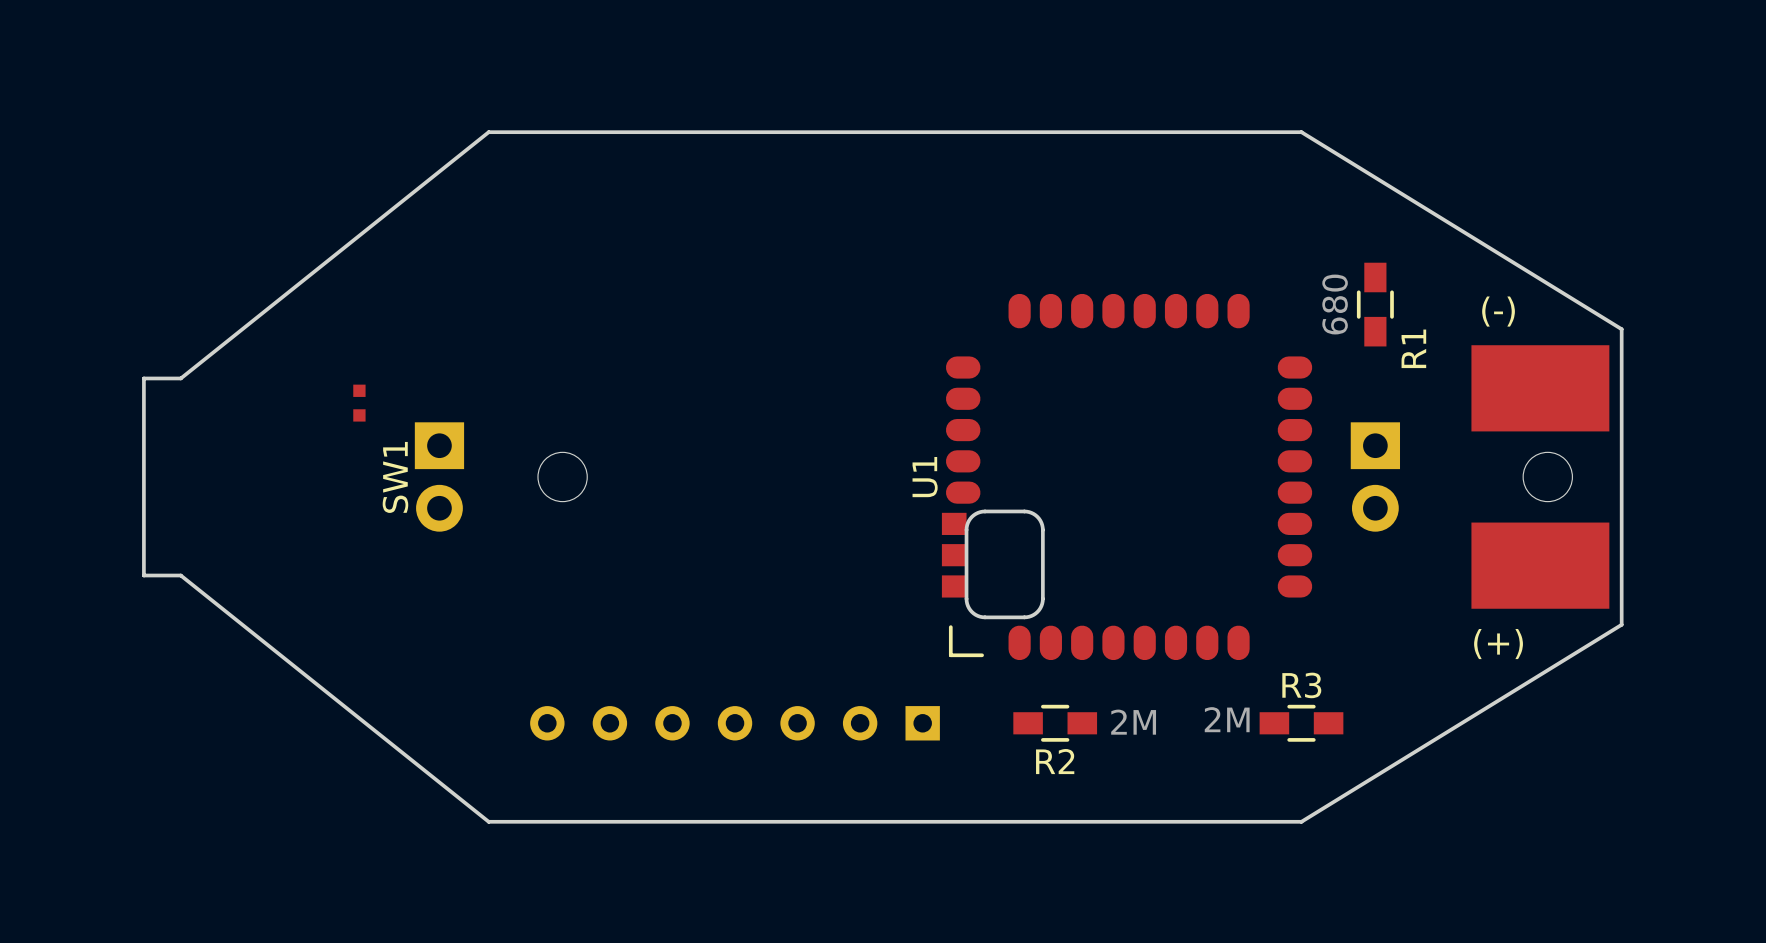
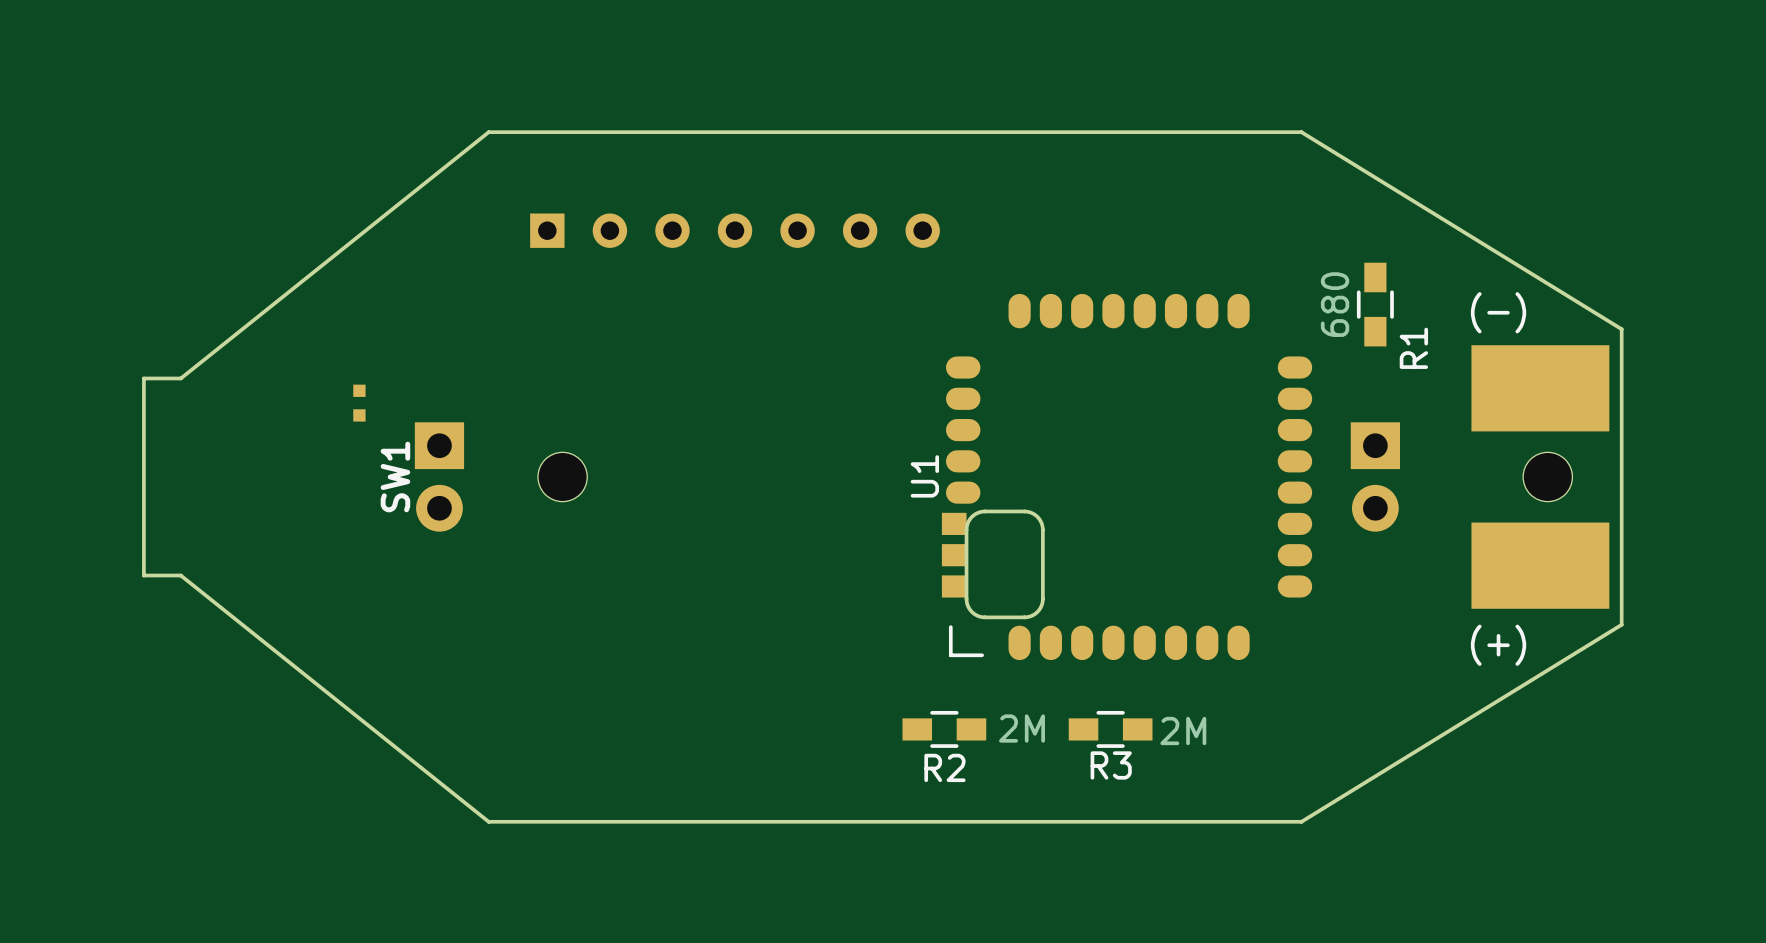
R3 name position: R3 (1301, 685) -> R3 (1111, 765)
R3 value position: 2M (1227, 719) -> 2M (1183, 730)
part rotation: 0° (735, 723) -> 180° (735, 230)
part position: (735, 723) -> (735, 230)
R2 position: (1055, 723) -> (944, 729)
R3 position: (1301, 723) -> (1110, 729)

